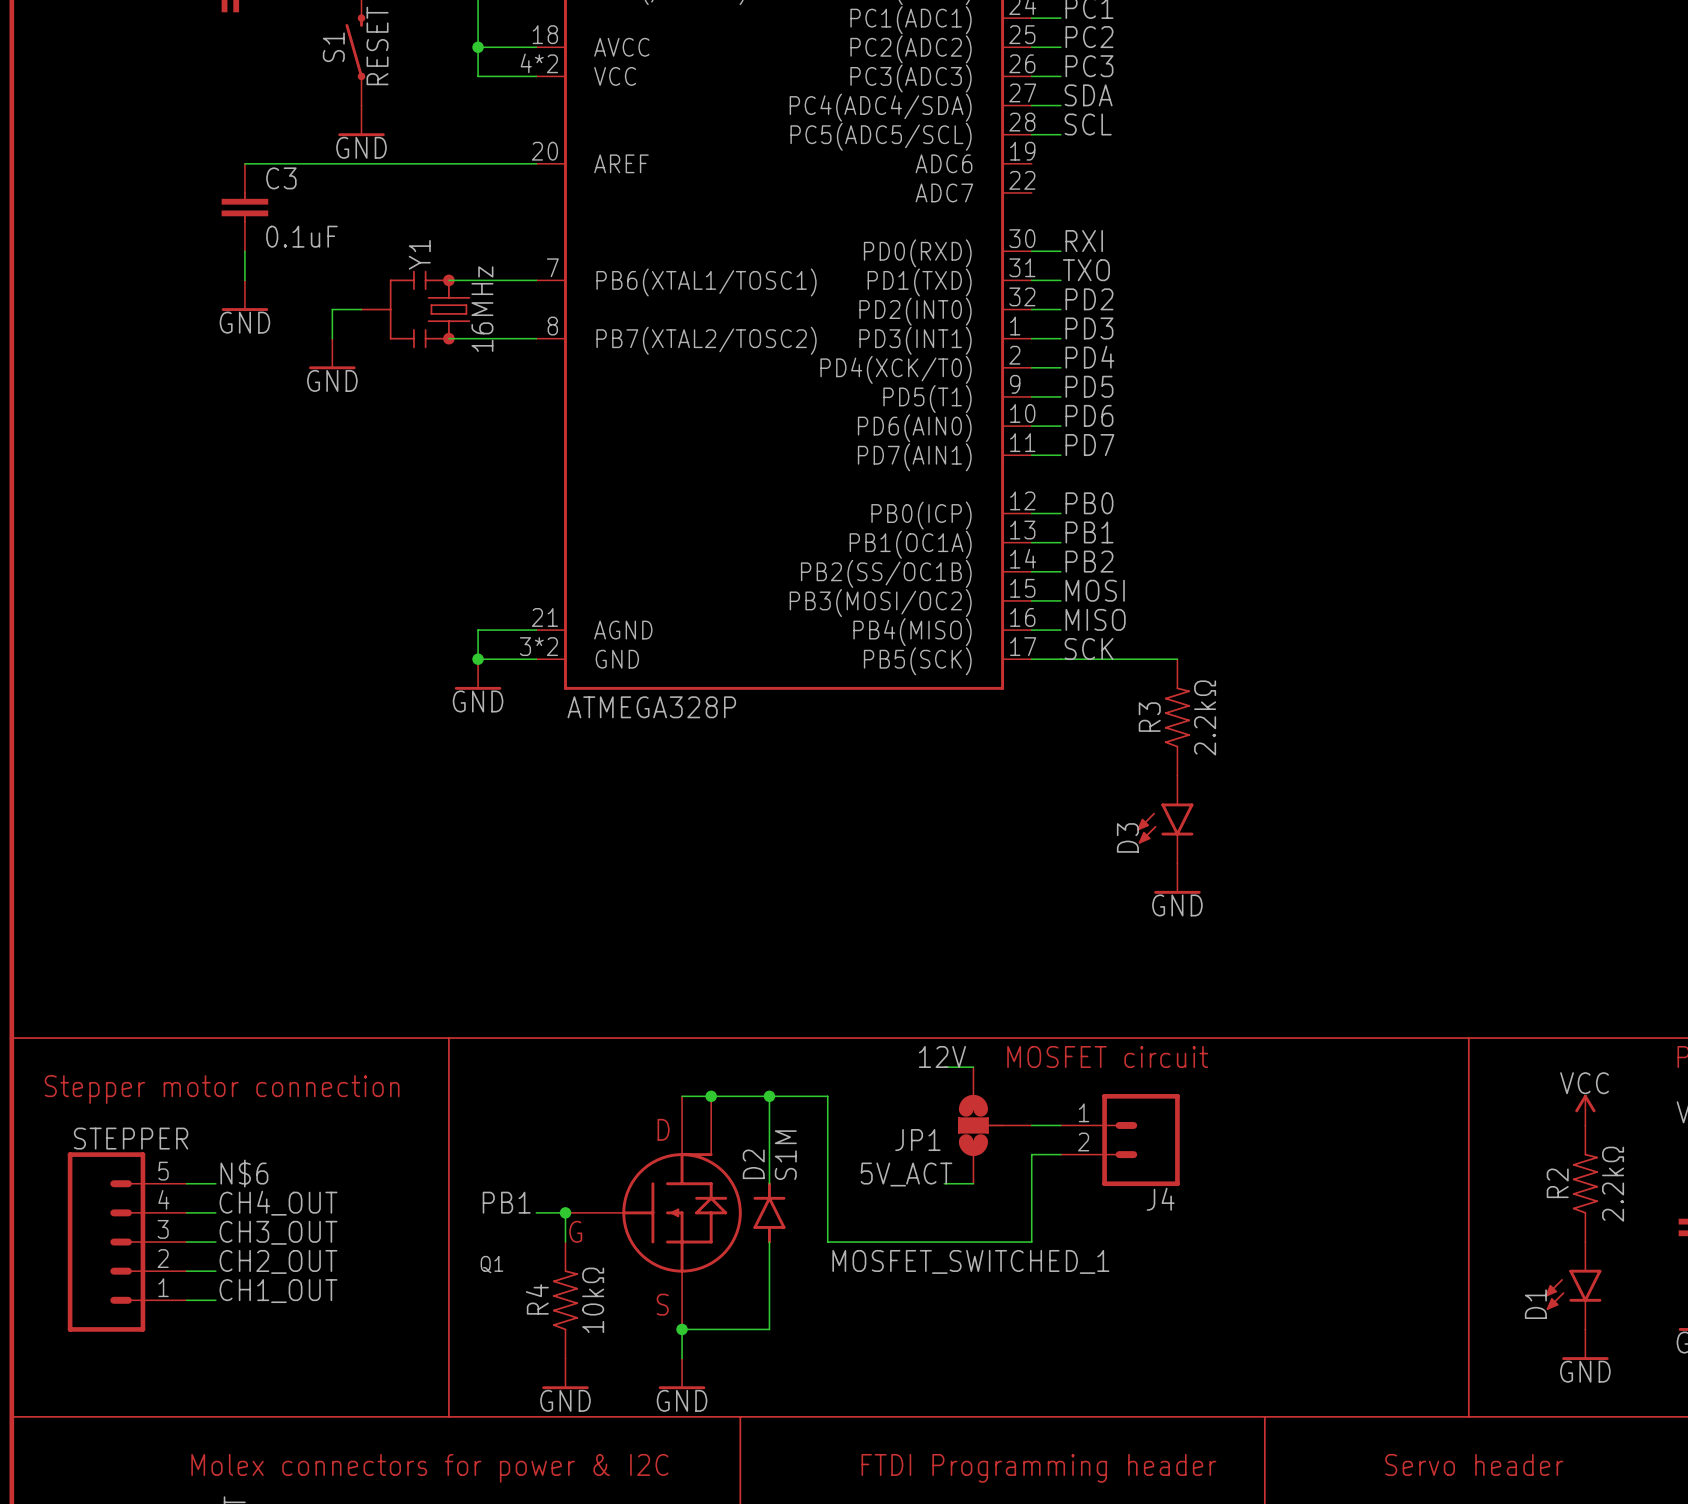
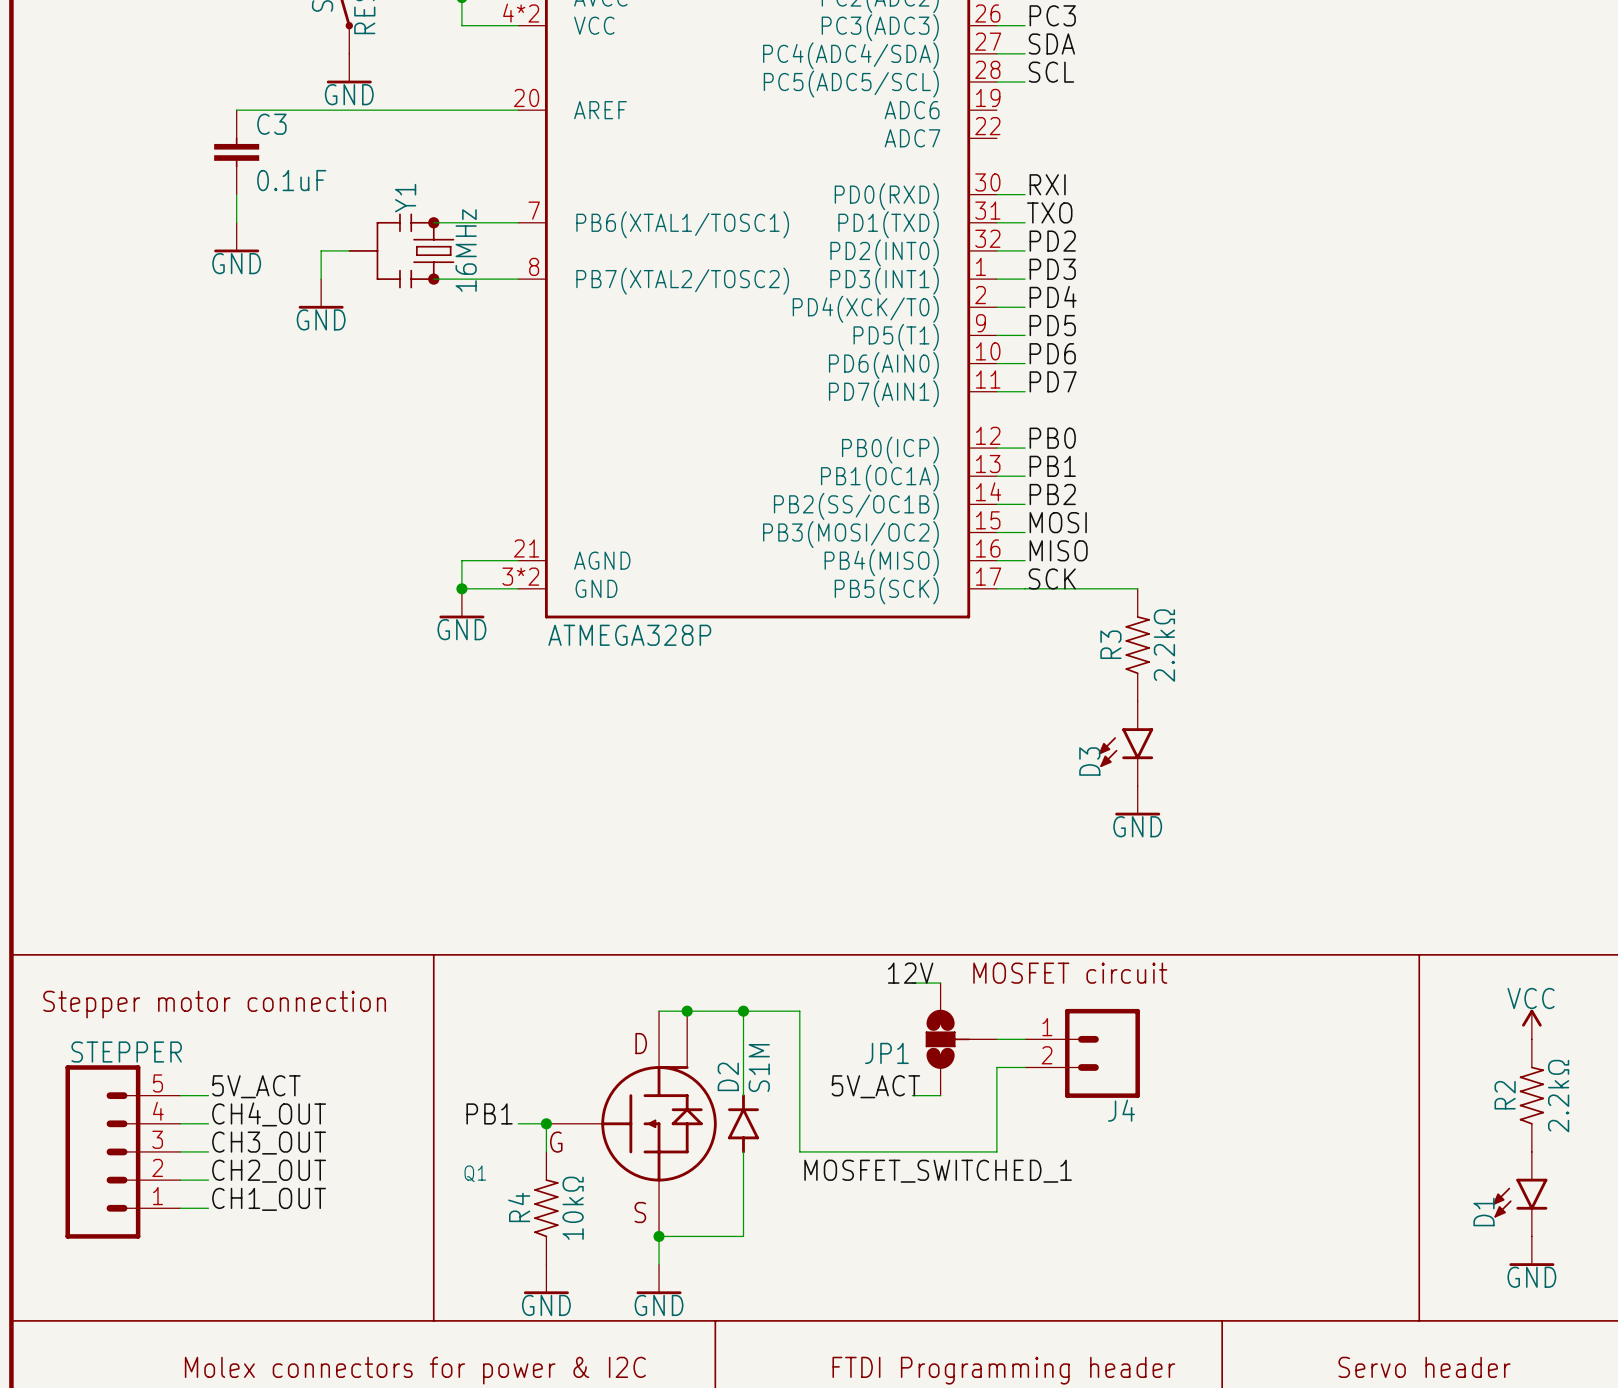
label: N$6 (244, 1173) -> 5V_ACT (256, 1086)

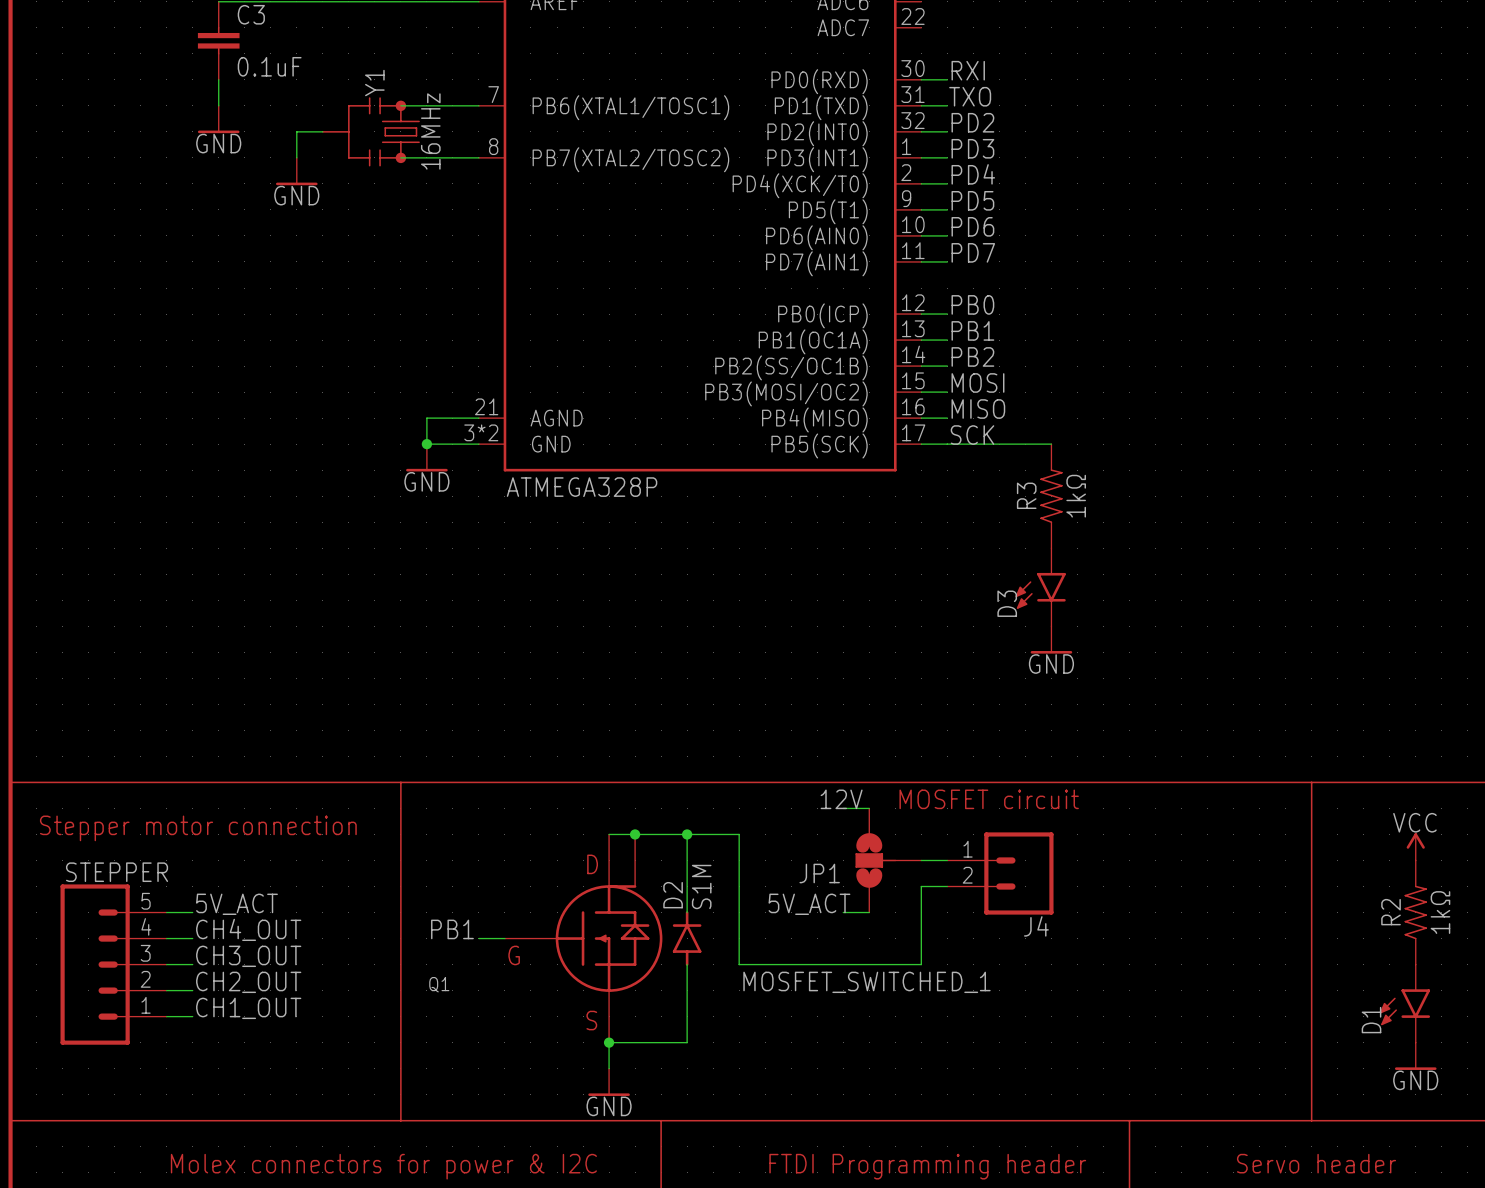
R3 value: 2.2kΩ (1164, 645) -> 1kΩ (1076, 496)
R2 value: 2.2kΩ (1558, 1096) -> 1kΩ (1440, 912)
wire: (546, 1123) (546, 1151) -> none
junction: (546, 1123) -> none
R4: 10kΩ (546, 1208) -> none
power symbol: GND (546, 1279) -> none

